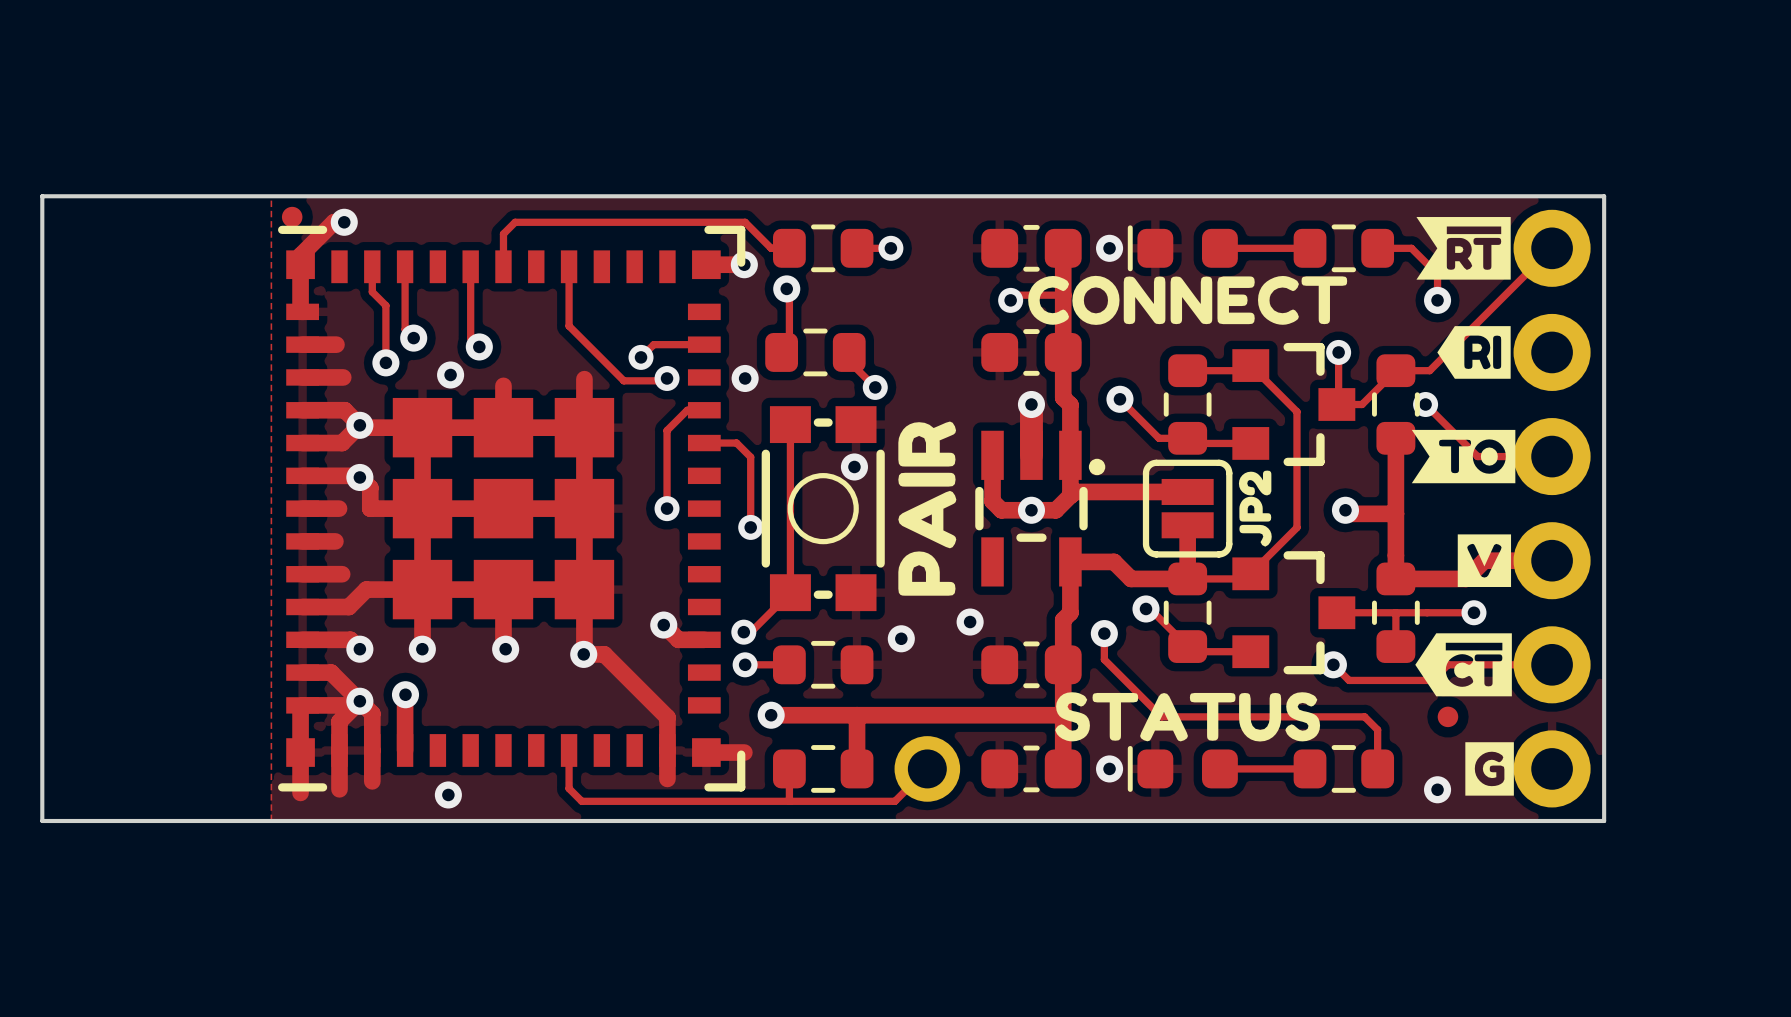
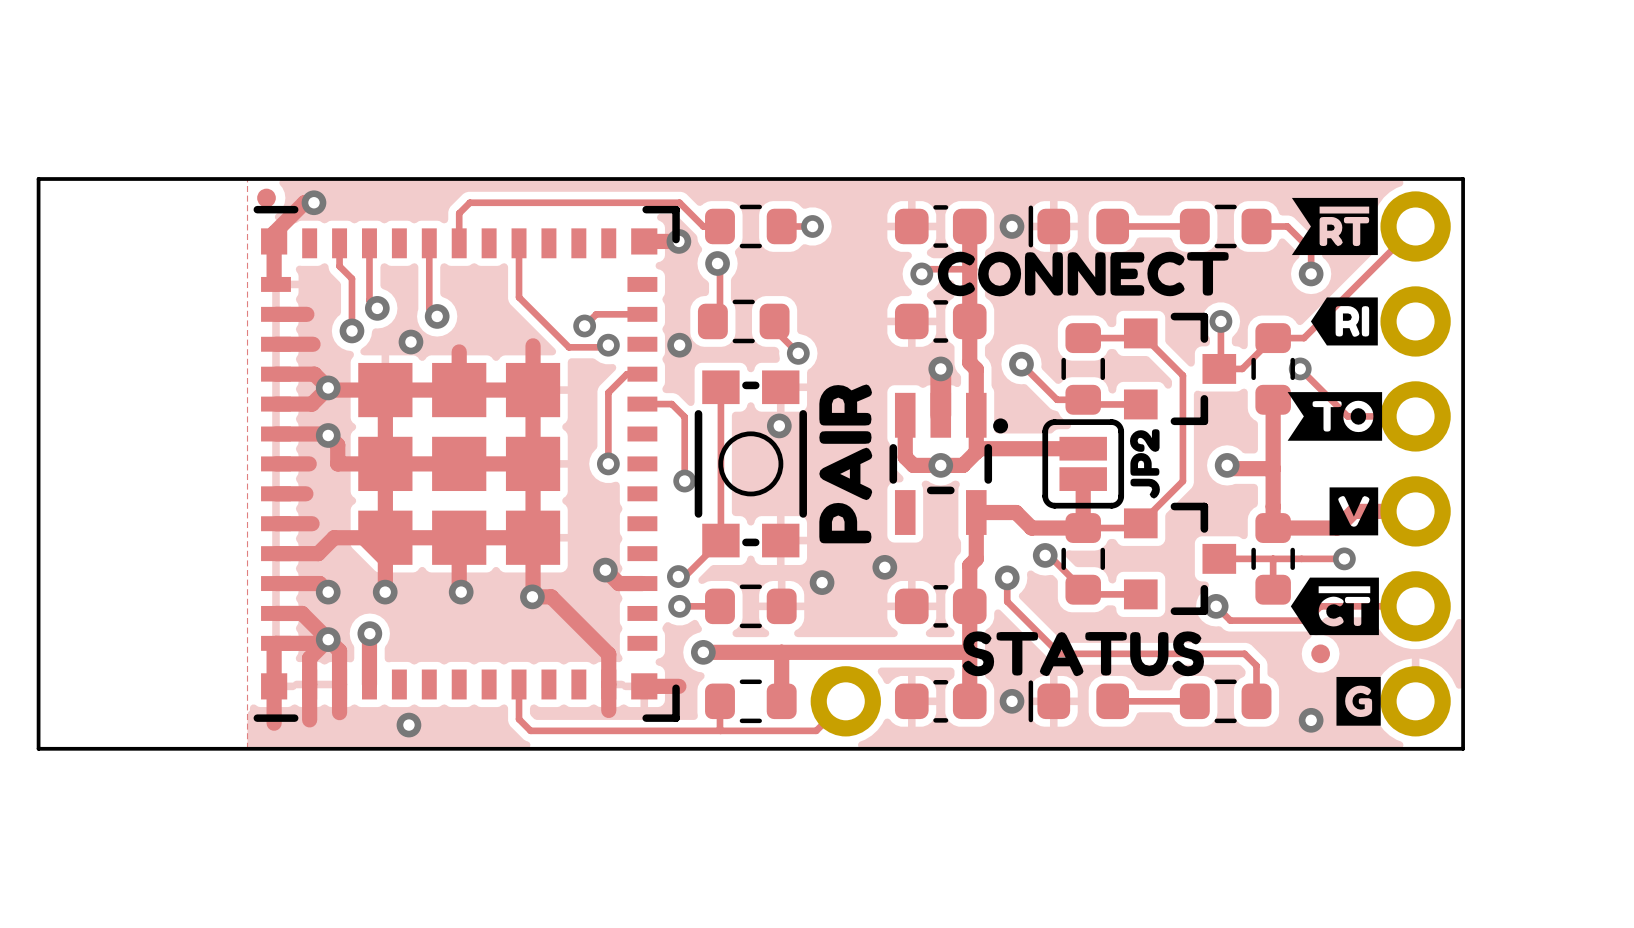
part footprint: [278, 225, 746, 792] -> [253, 205, 680, 722]
part footprint: [894, 736, 961, 802] -> [810, 666, 881, 737]

